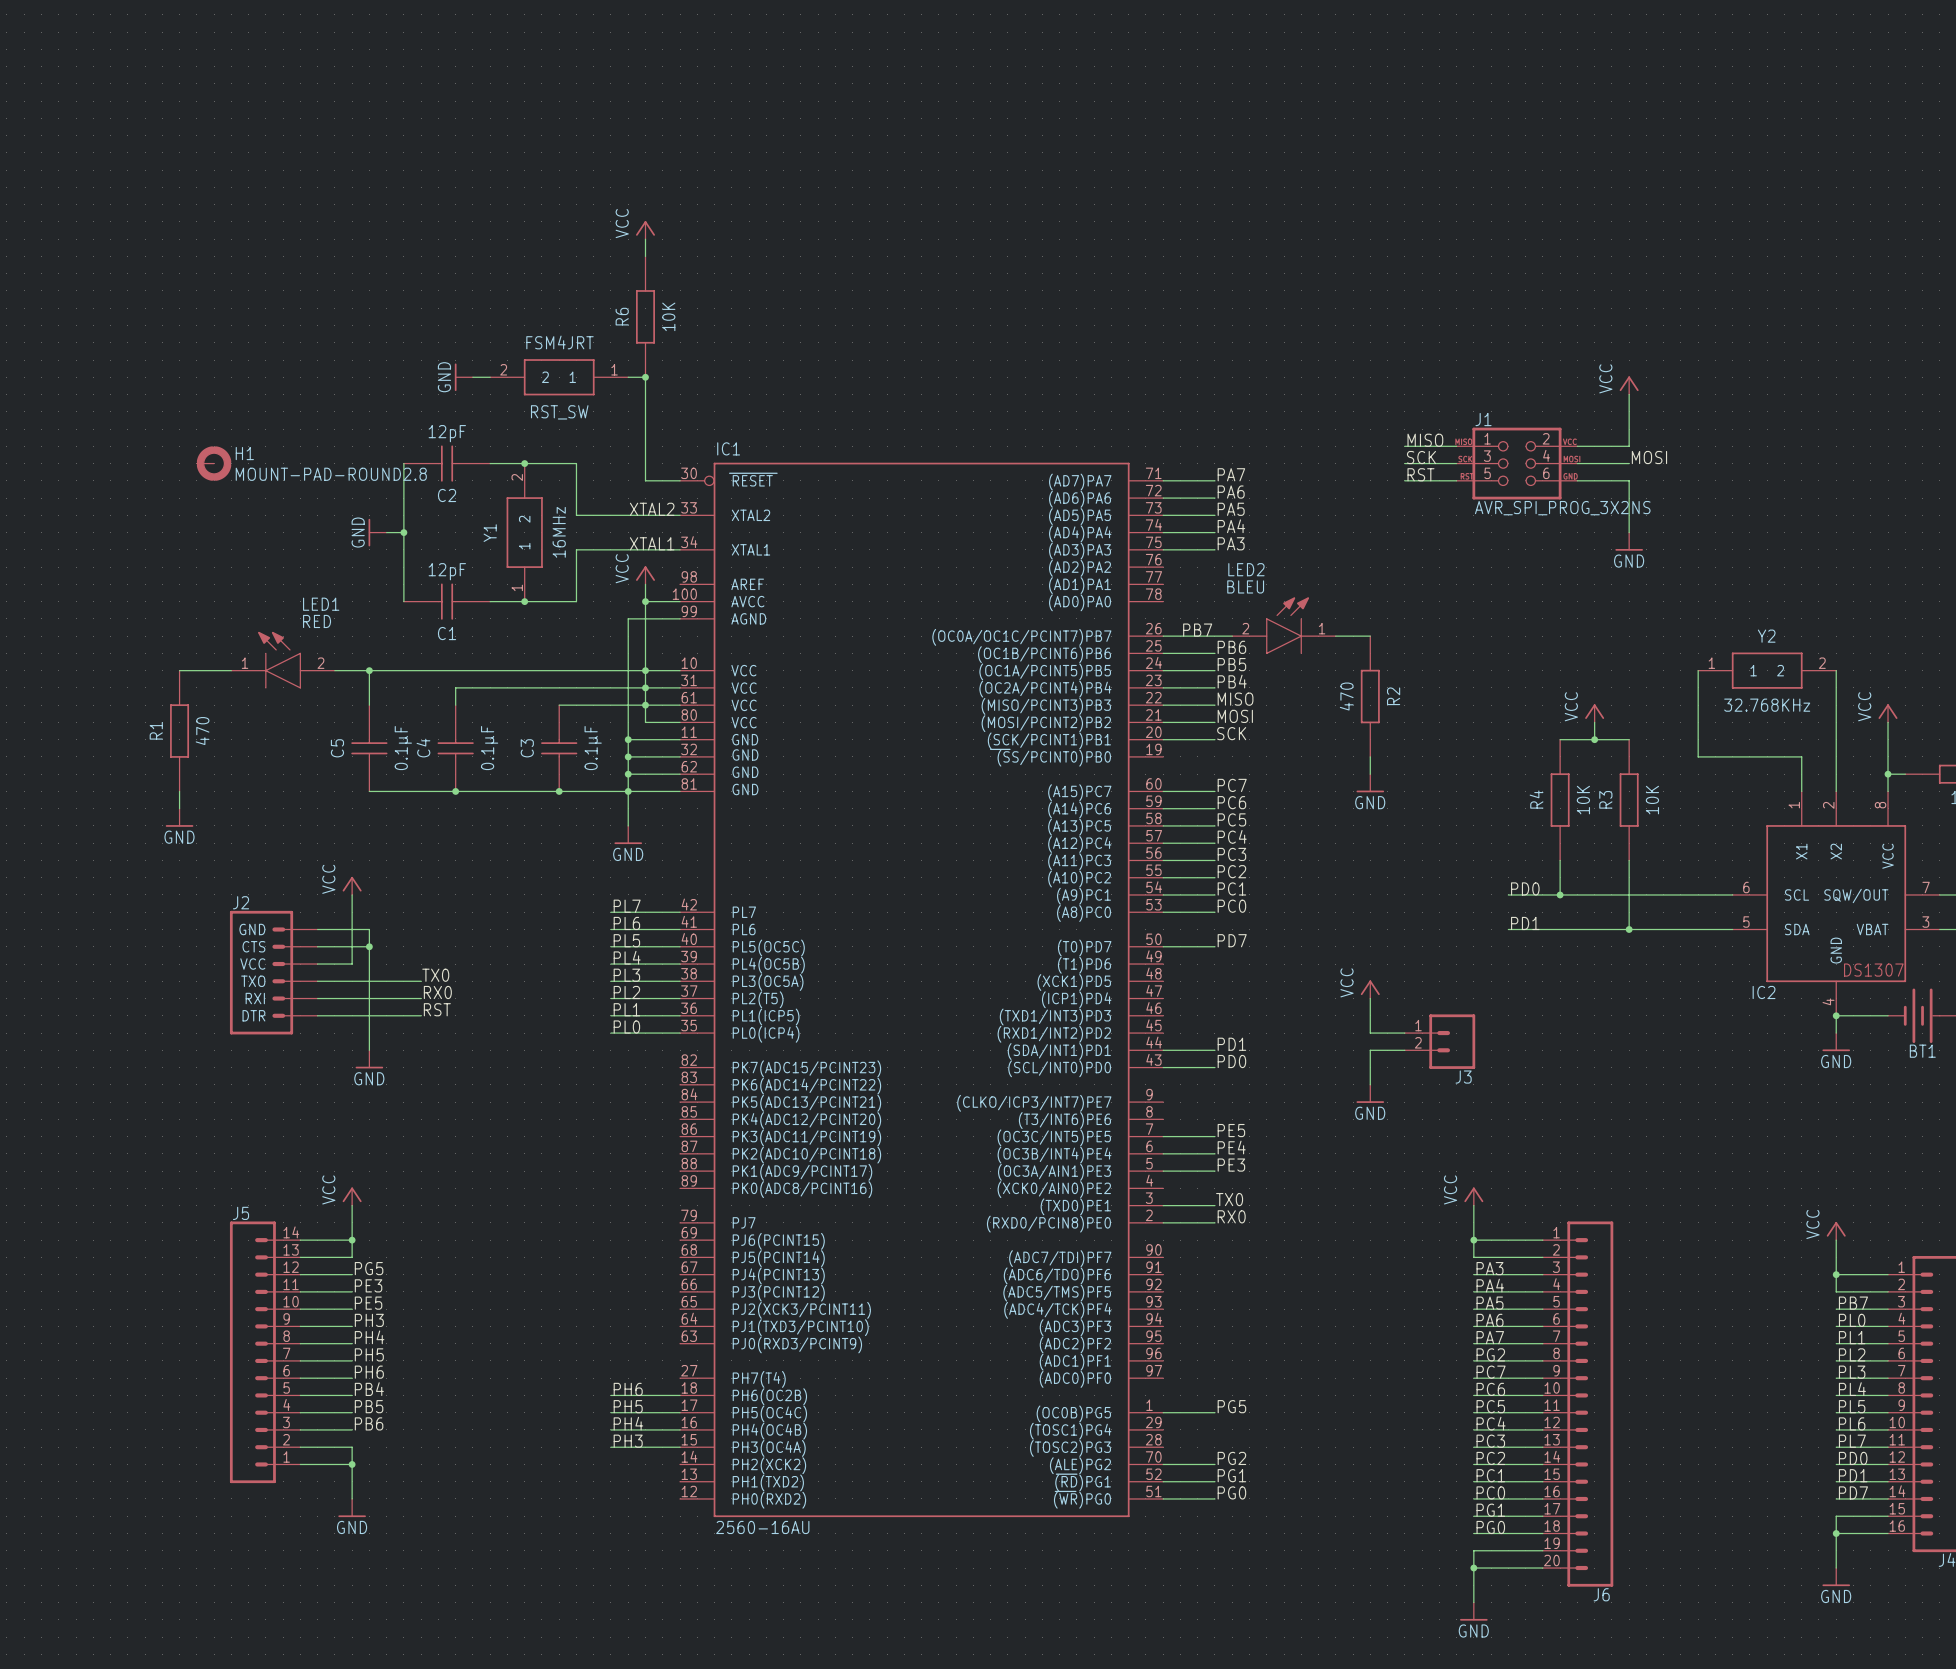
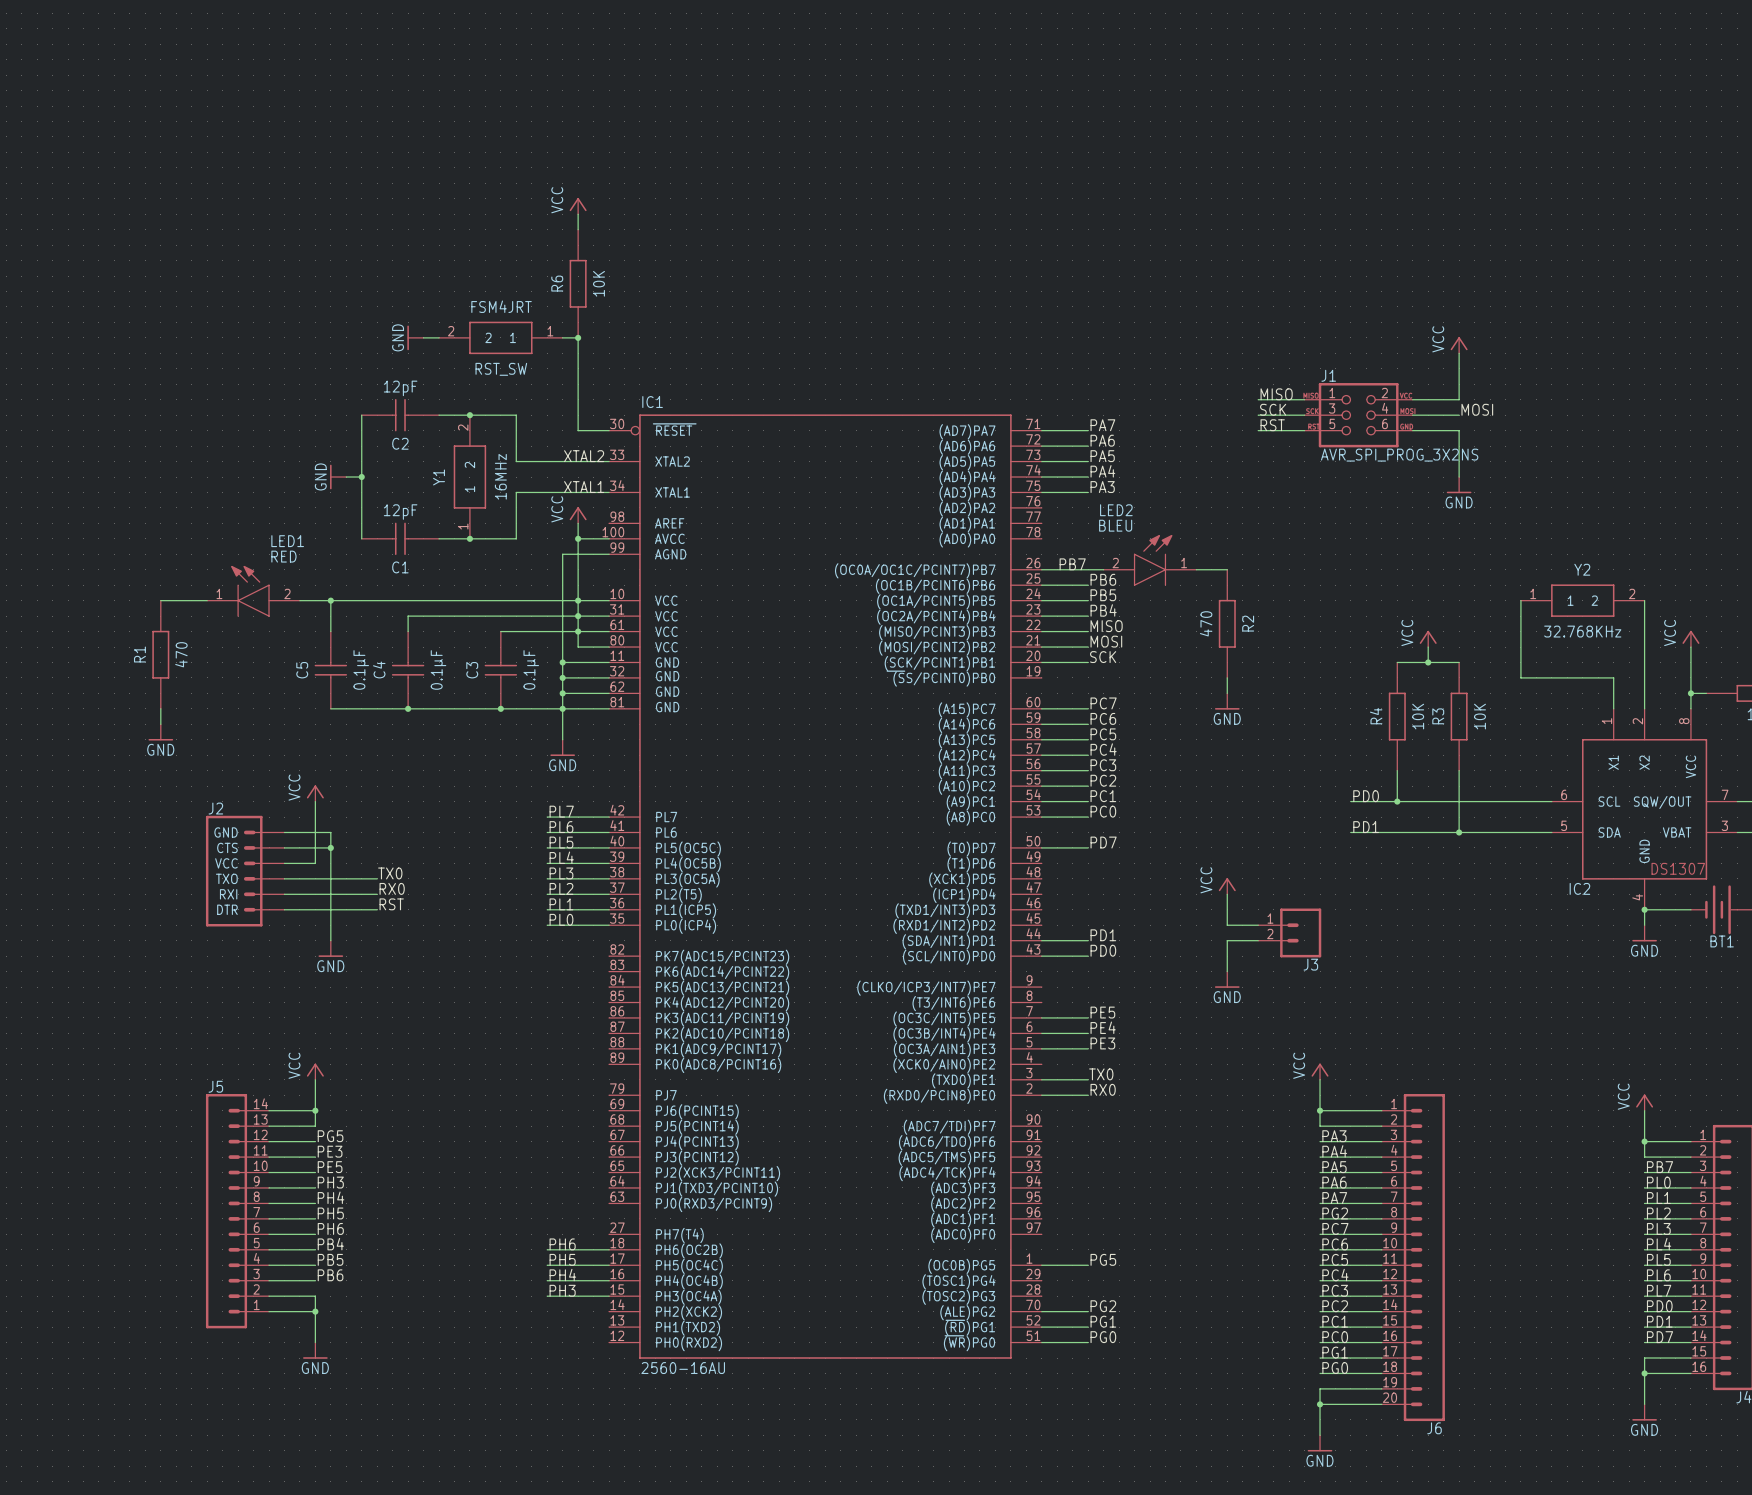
H1: MOUNT-PAD-ROUND2.8 (214, 463) -> none

